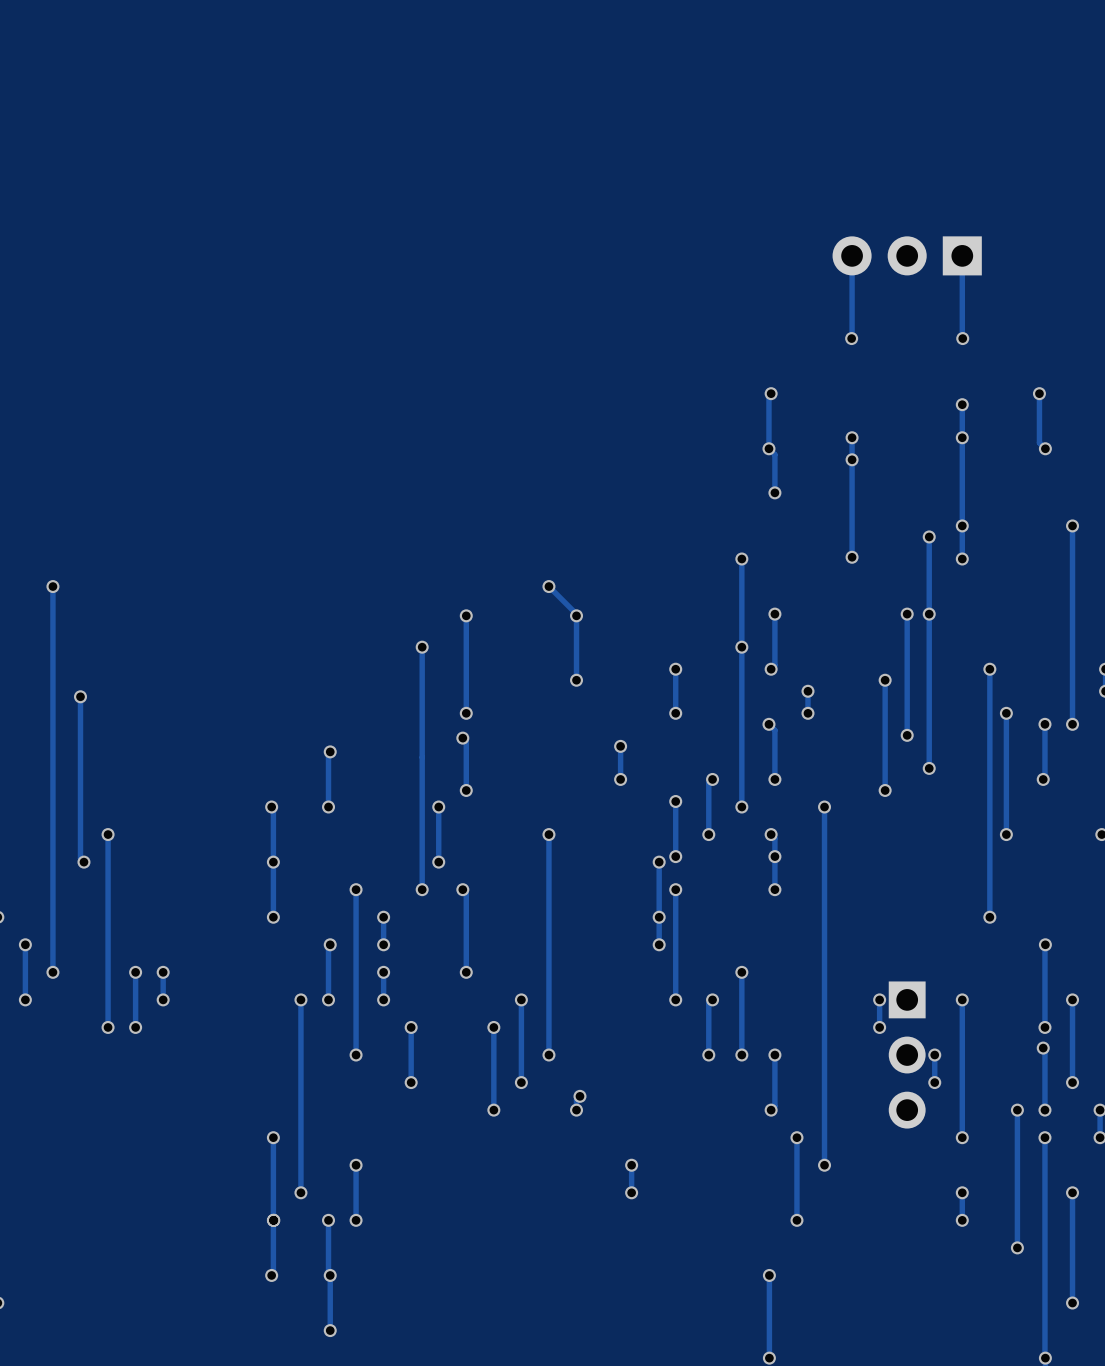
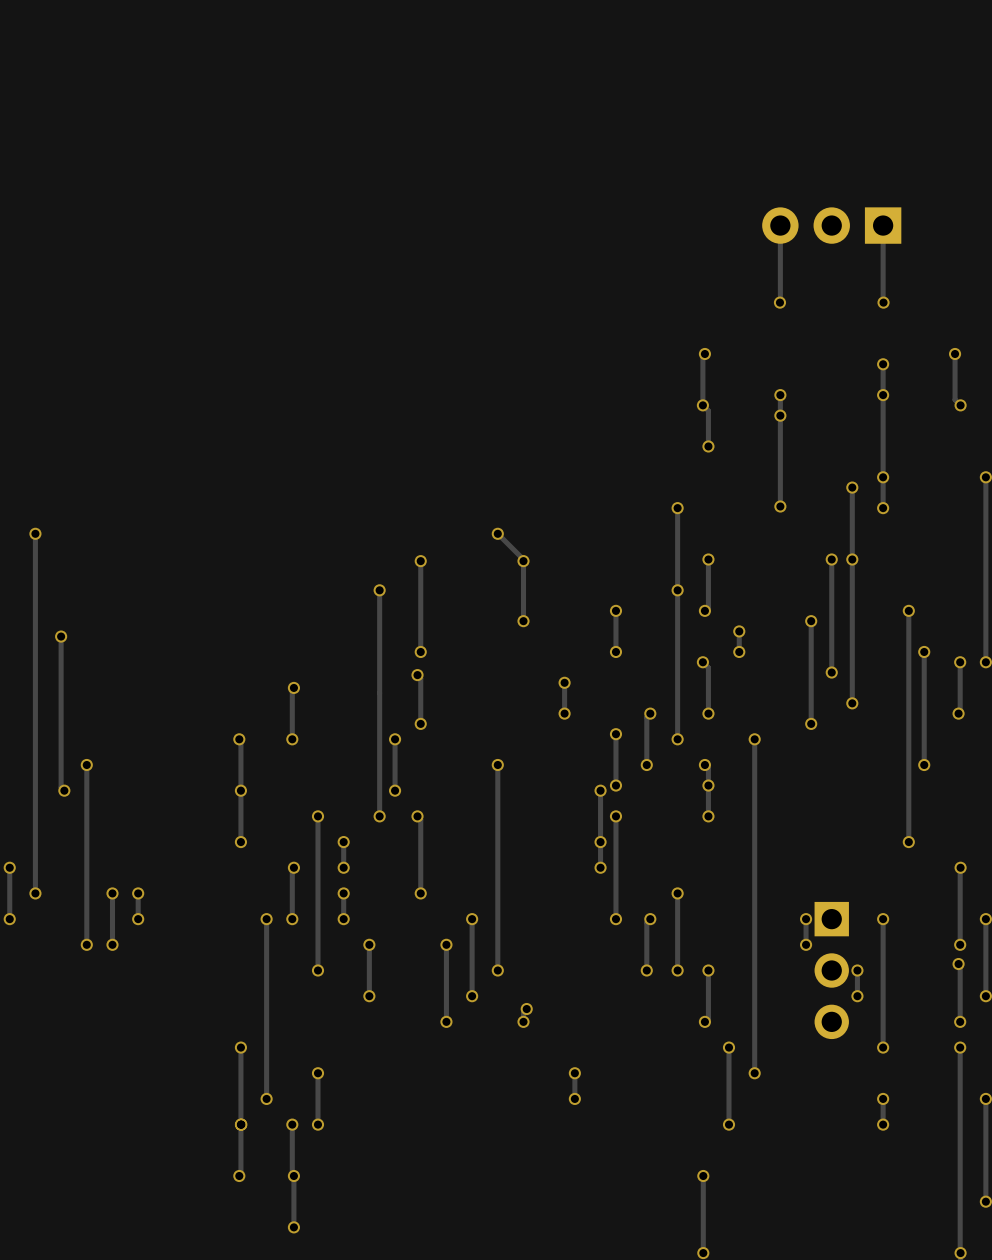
track: (1017, 1110) (1017, 1247) -> none
via: (1017, 1110) -> none
via: (1017, 1247) -> none

